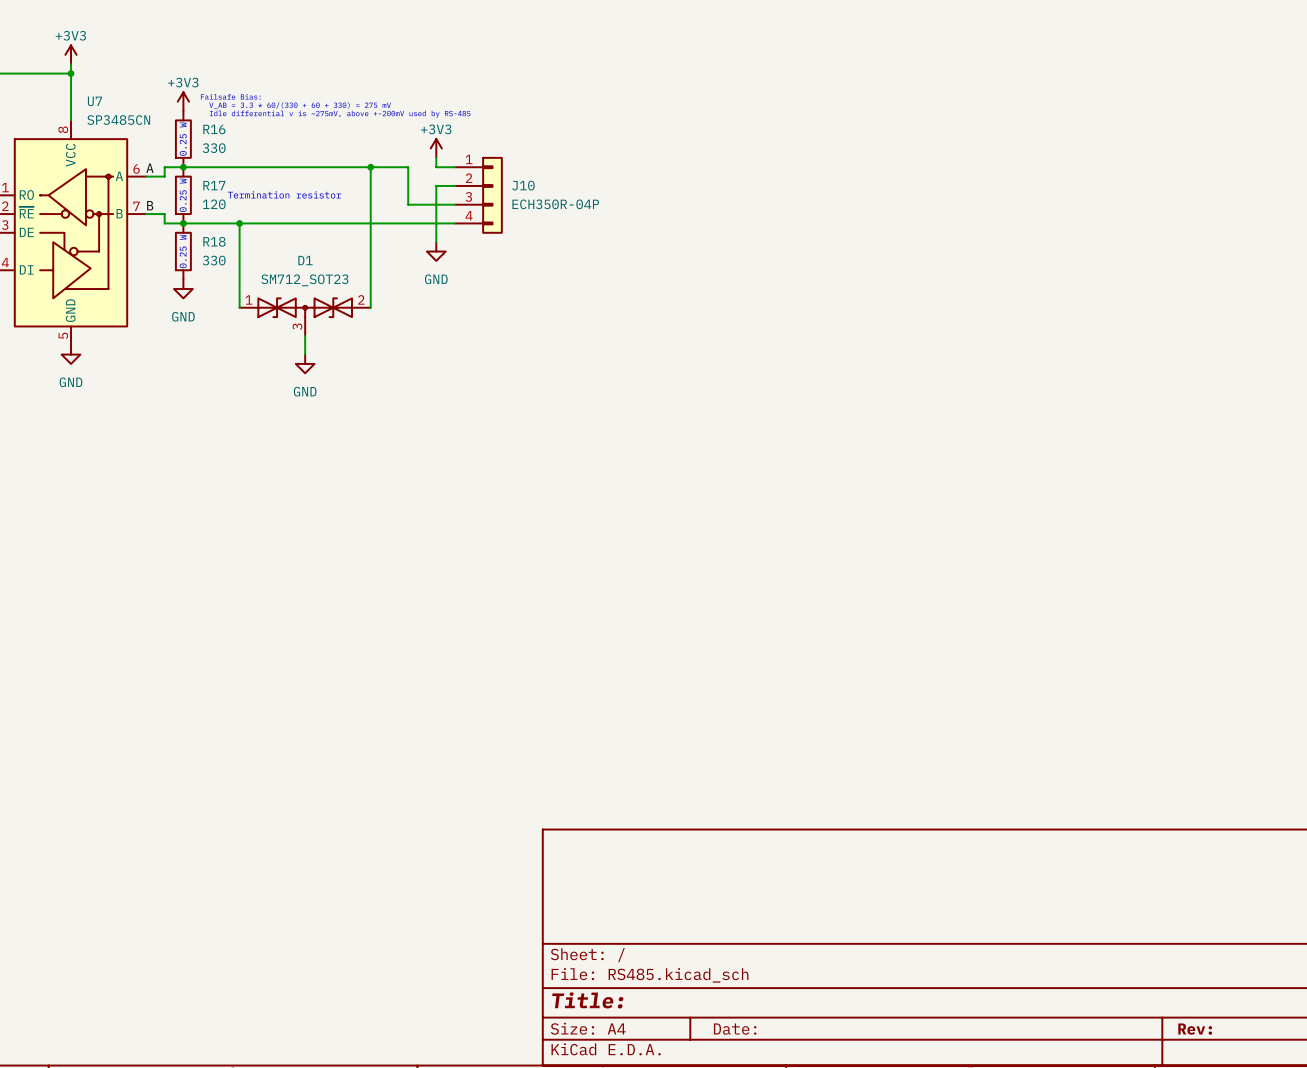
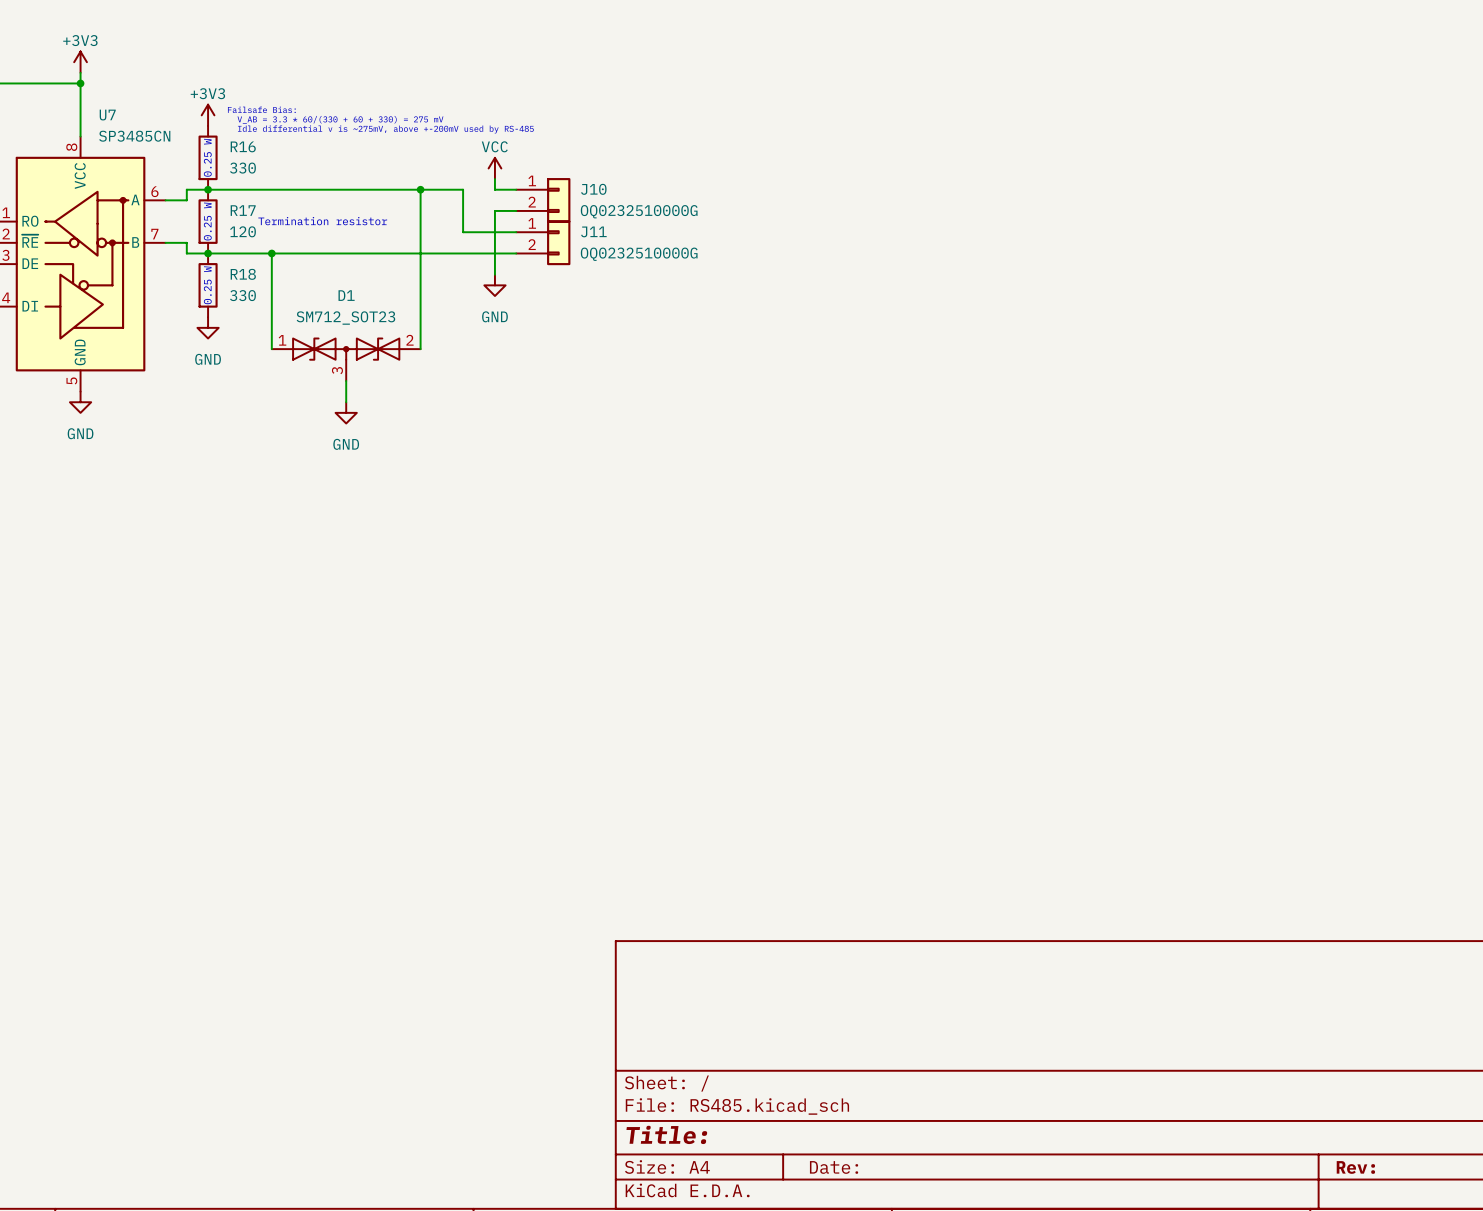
power symbol: +3V3 (436, 148) -> VCC (494, 168)
J10 symbol: [455, 156, 503, 234] -> [516, 178, 571, 223]
label: A (149, 168) -> none
J10 value: ECH350R-04P (555, 204) -> OQ0232510000G (639, 211)
label: B (150, 205) -> none
J11: none -> OQ0232510000G (543, 242)

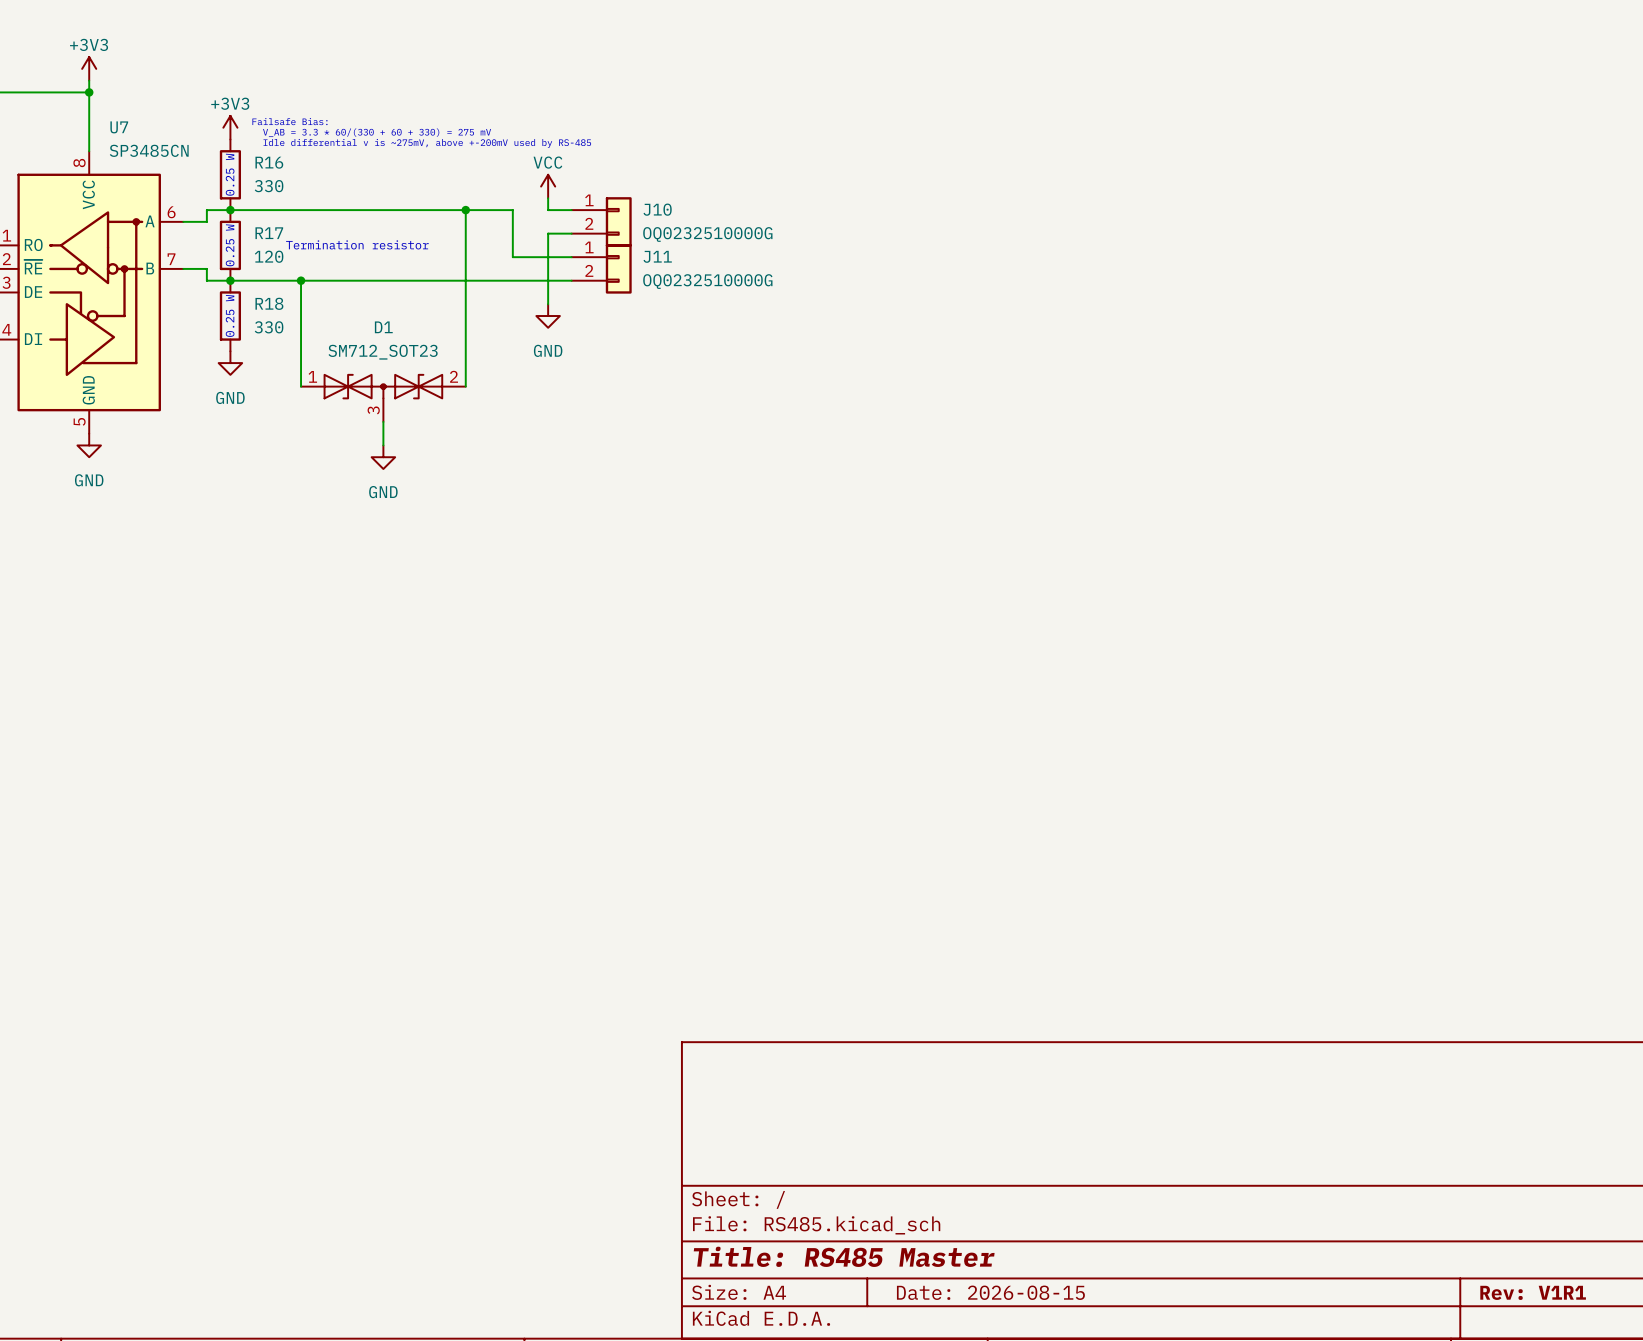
title block: Title: (666, 1134) -> Title: RS485 Master (844, 1256)
title block: Date: (834, 1167) -> Date: 2026-08-15 (990, 1292)
title block: Rev: (1355, 1167) -> Rev: V1R1 (1533, 1292)

